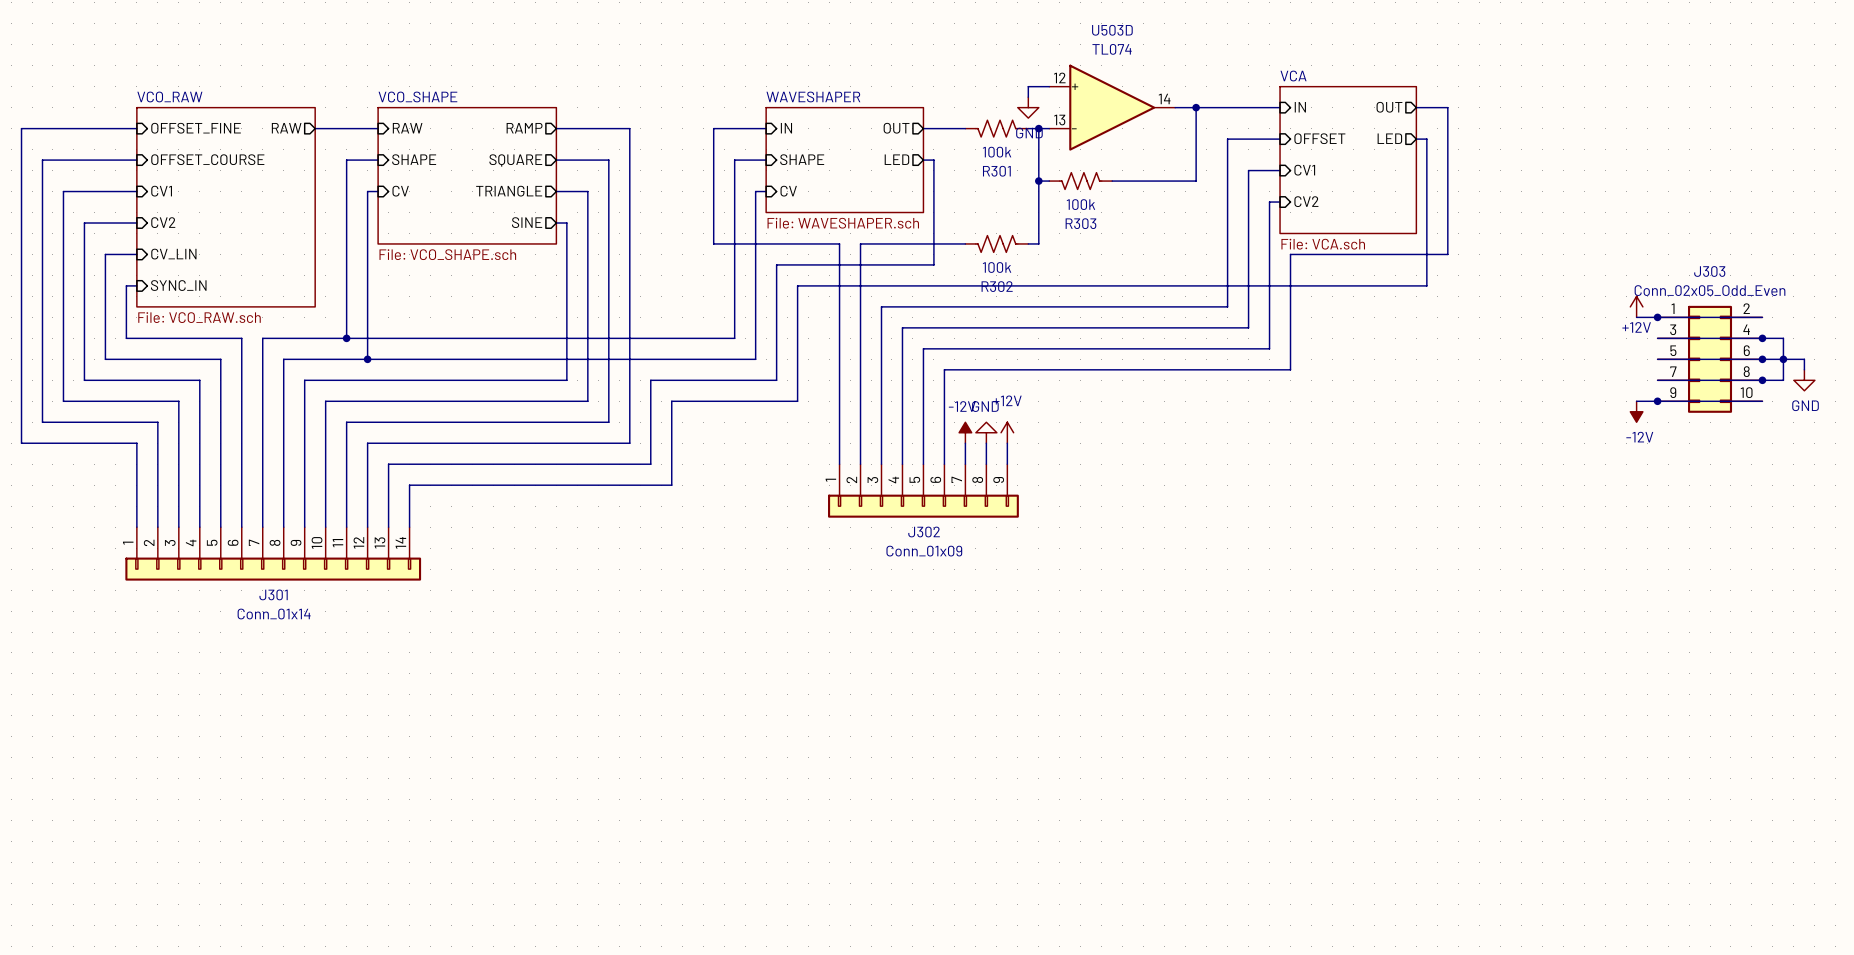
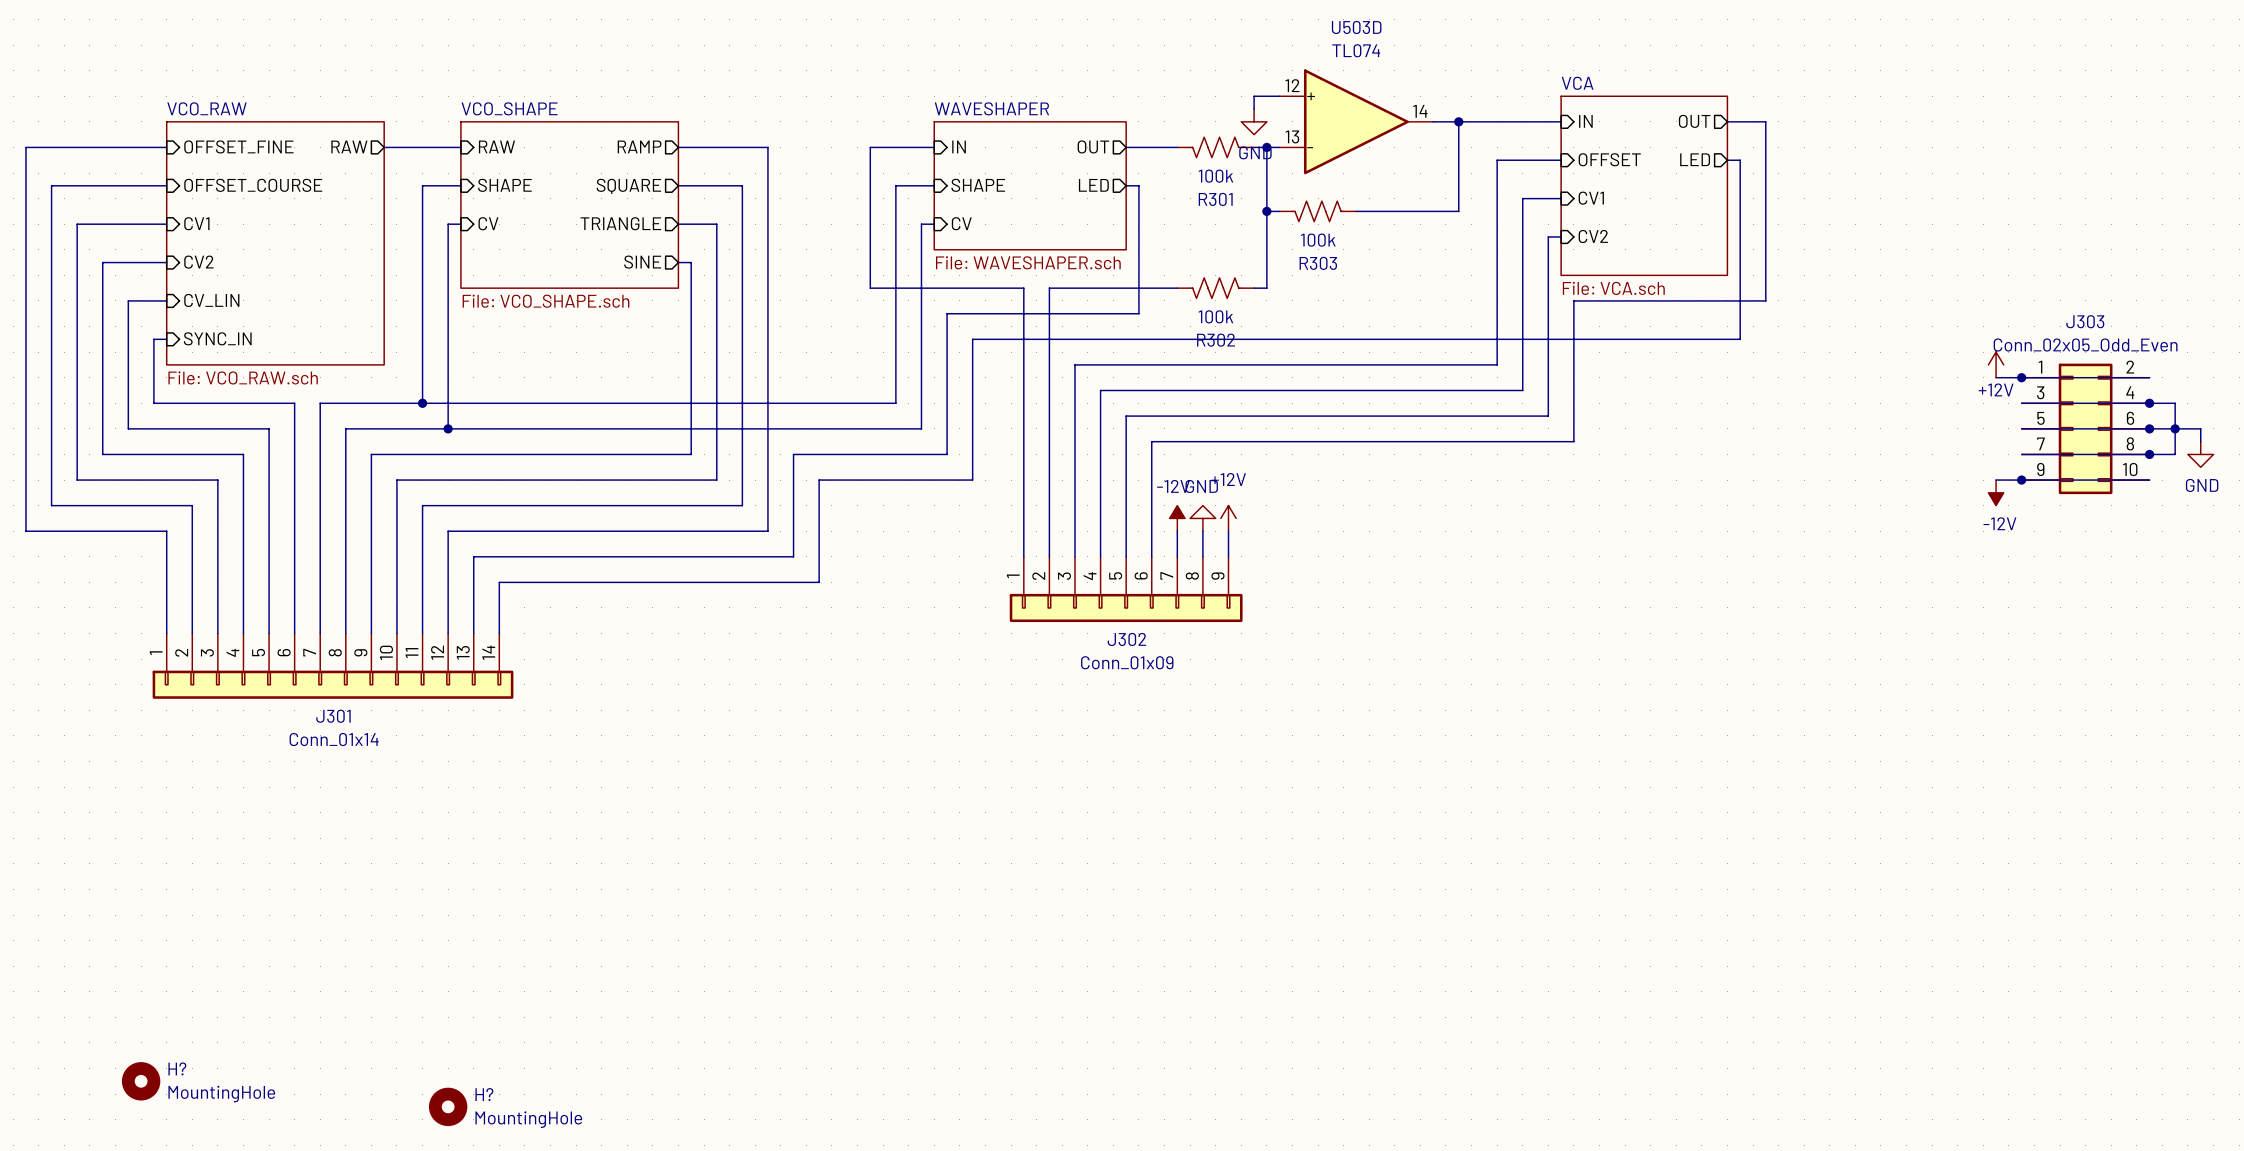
H?: none -> MountingHole (141, 1081)
H?: none -> MountingHole (448, 1106)

